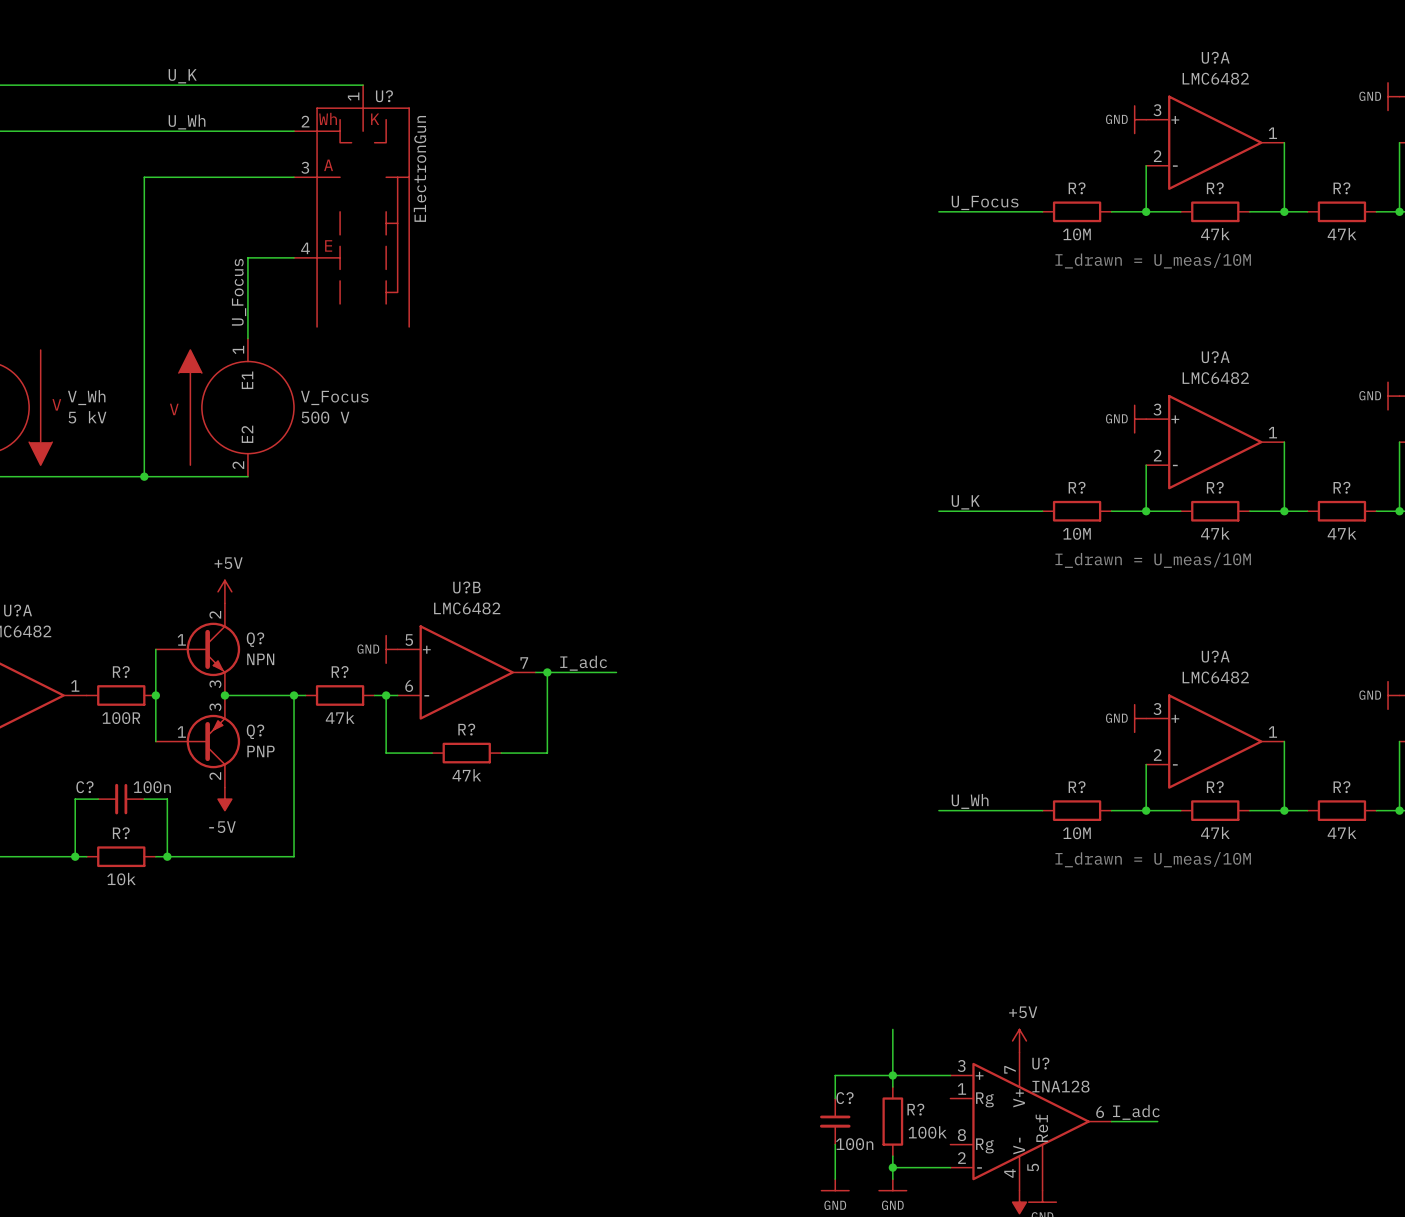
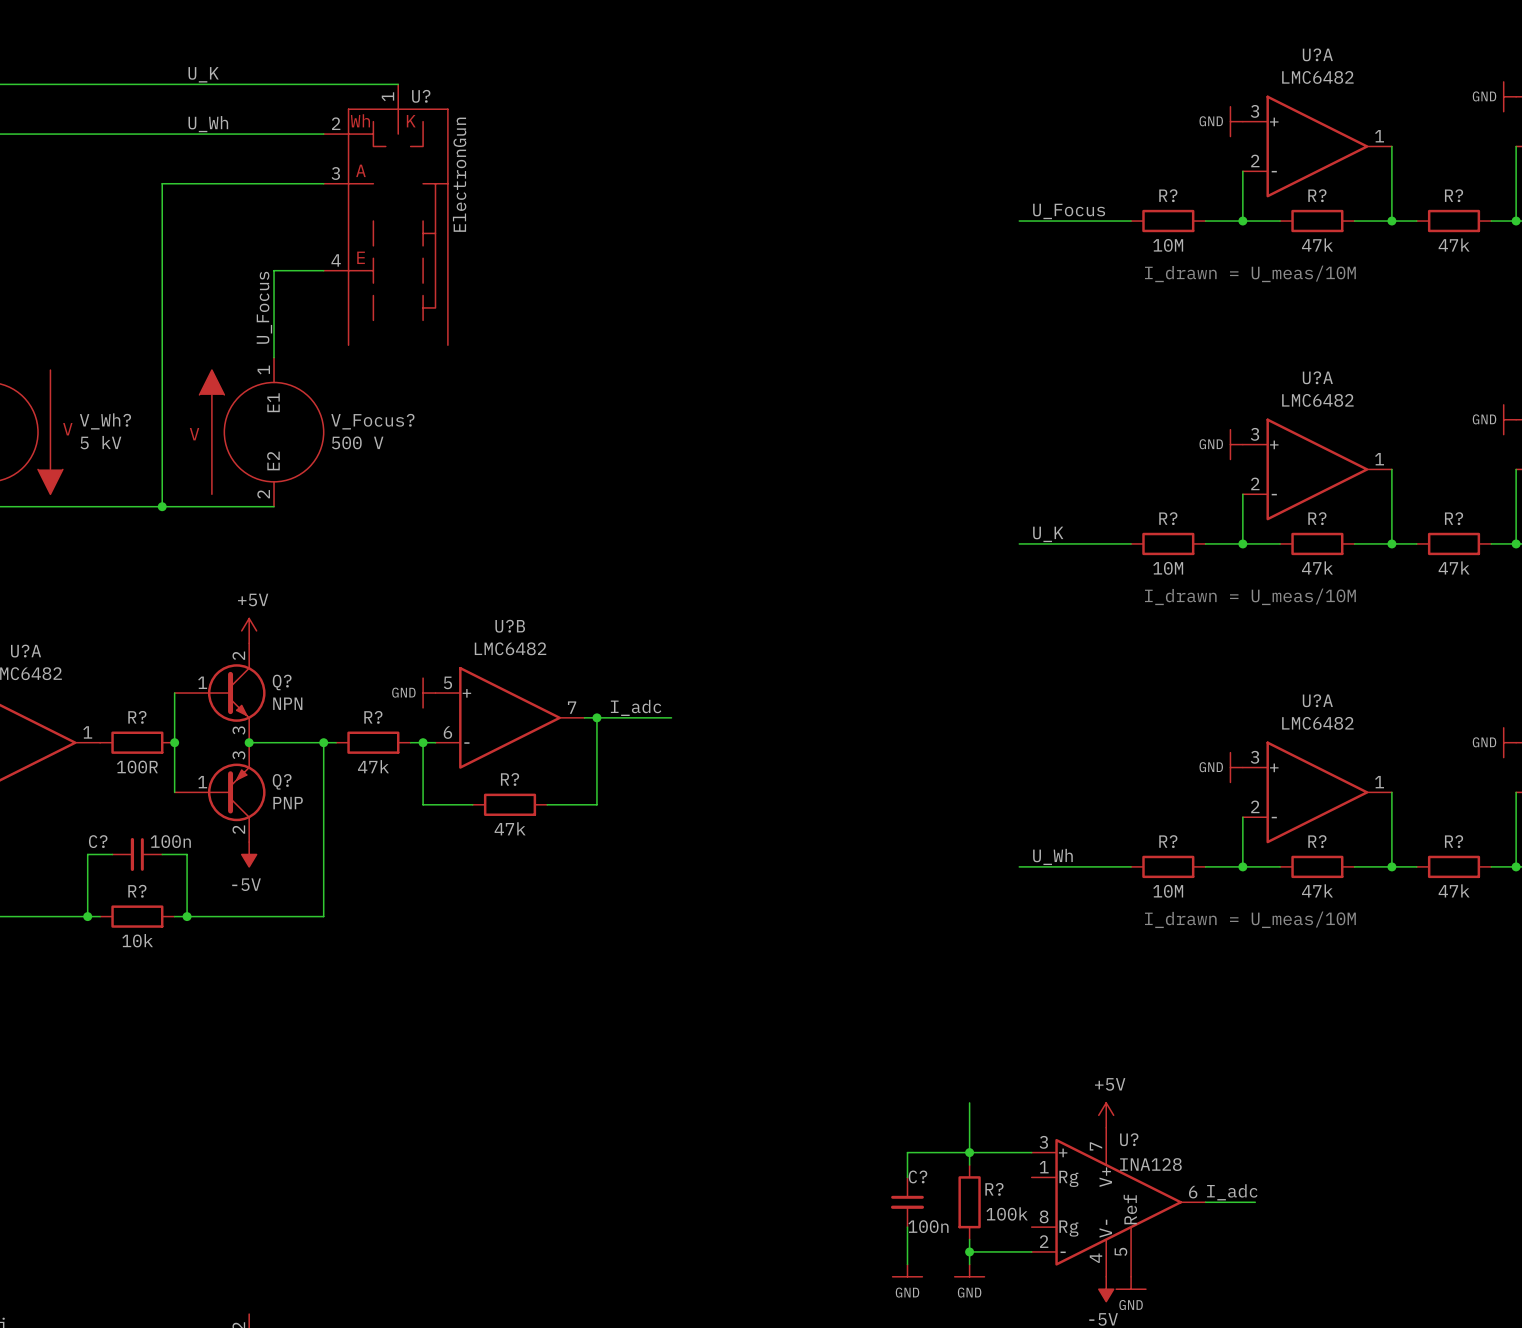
V_Wh name: V_Wh (86, 397) -> V_Wh? (105, 421)
V_Focus name: V_Focus (334, 397) -> V_Focus? (372, 421)

